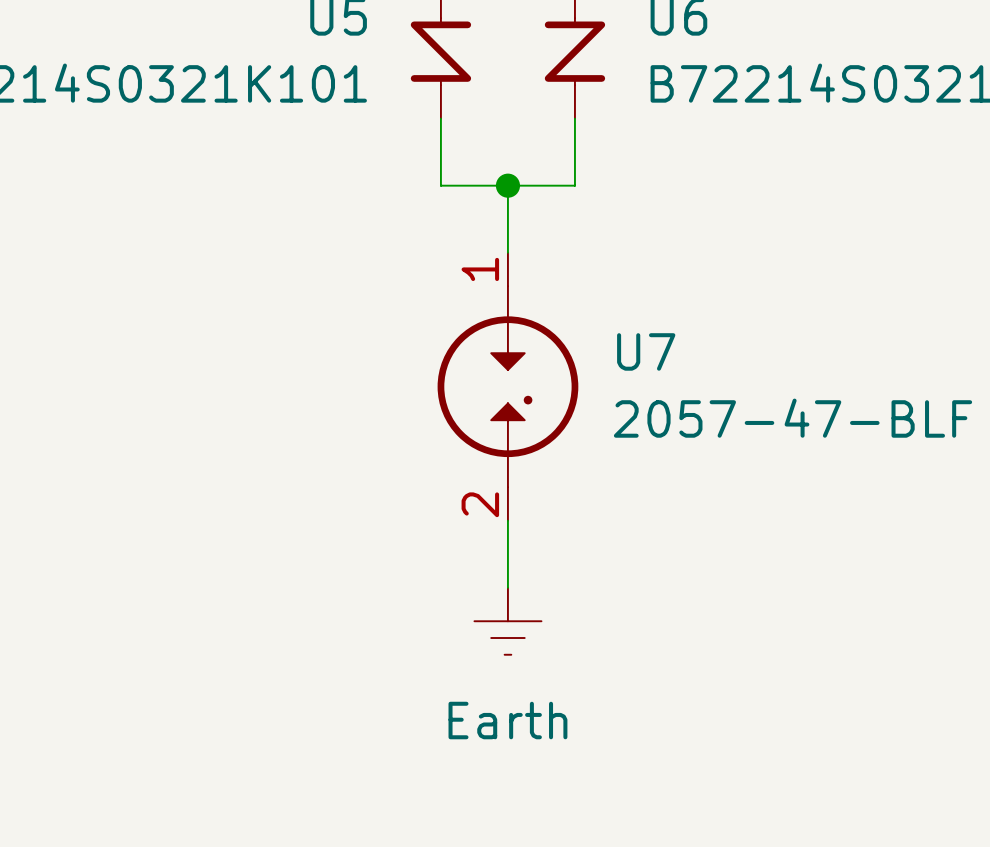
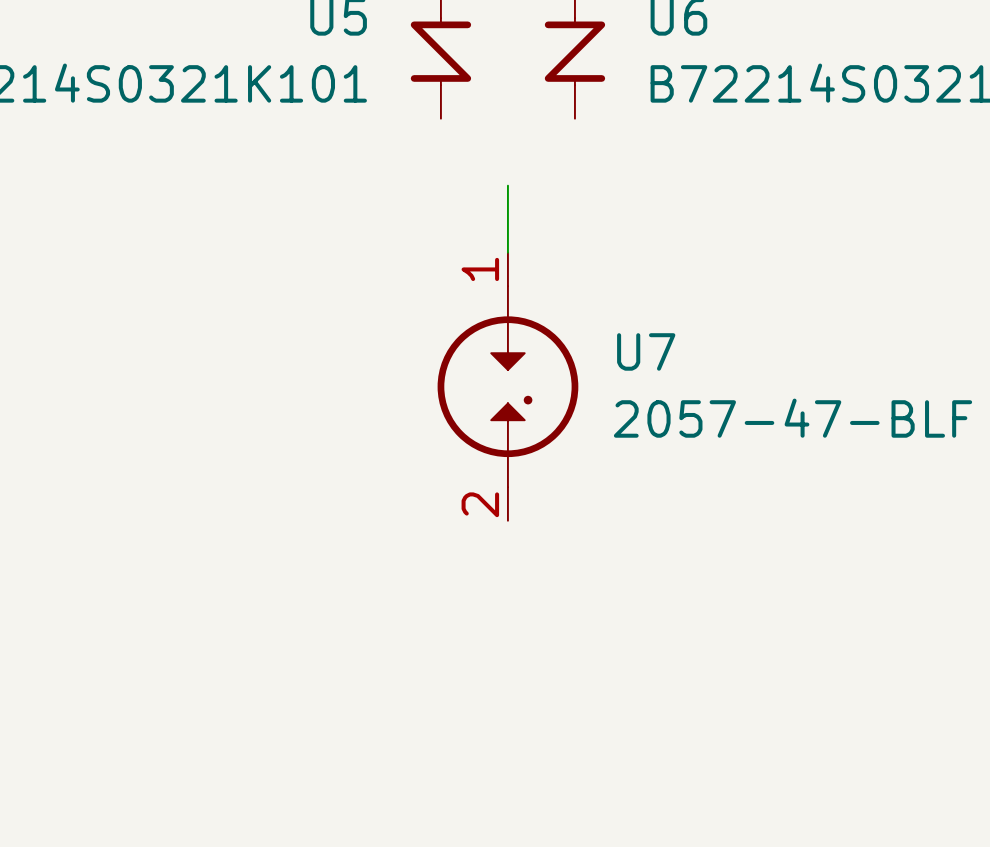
wire: (440, 118) (440, 185) (574, 185) (574, 118) -> none
junction: (507, 185) -> none
wire: (507, 520) (507, 587) -> none
power symbol: Earth (507, 621) -> none

